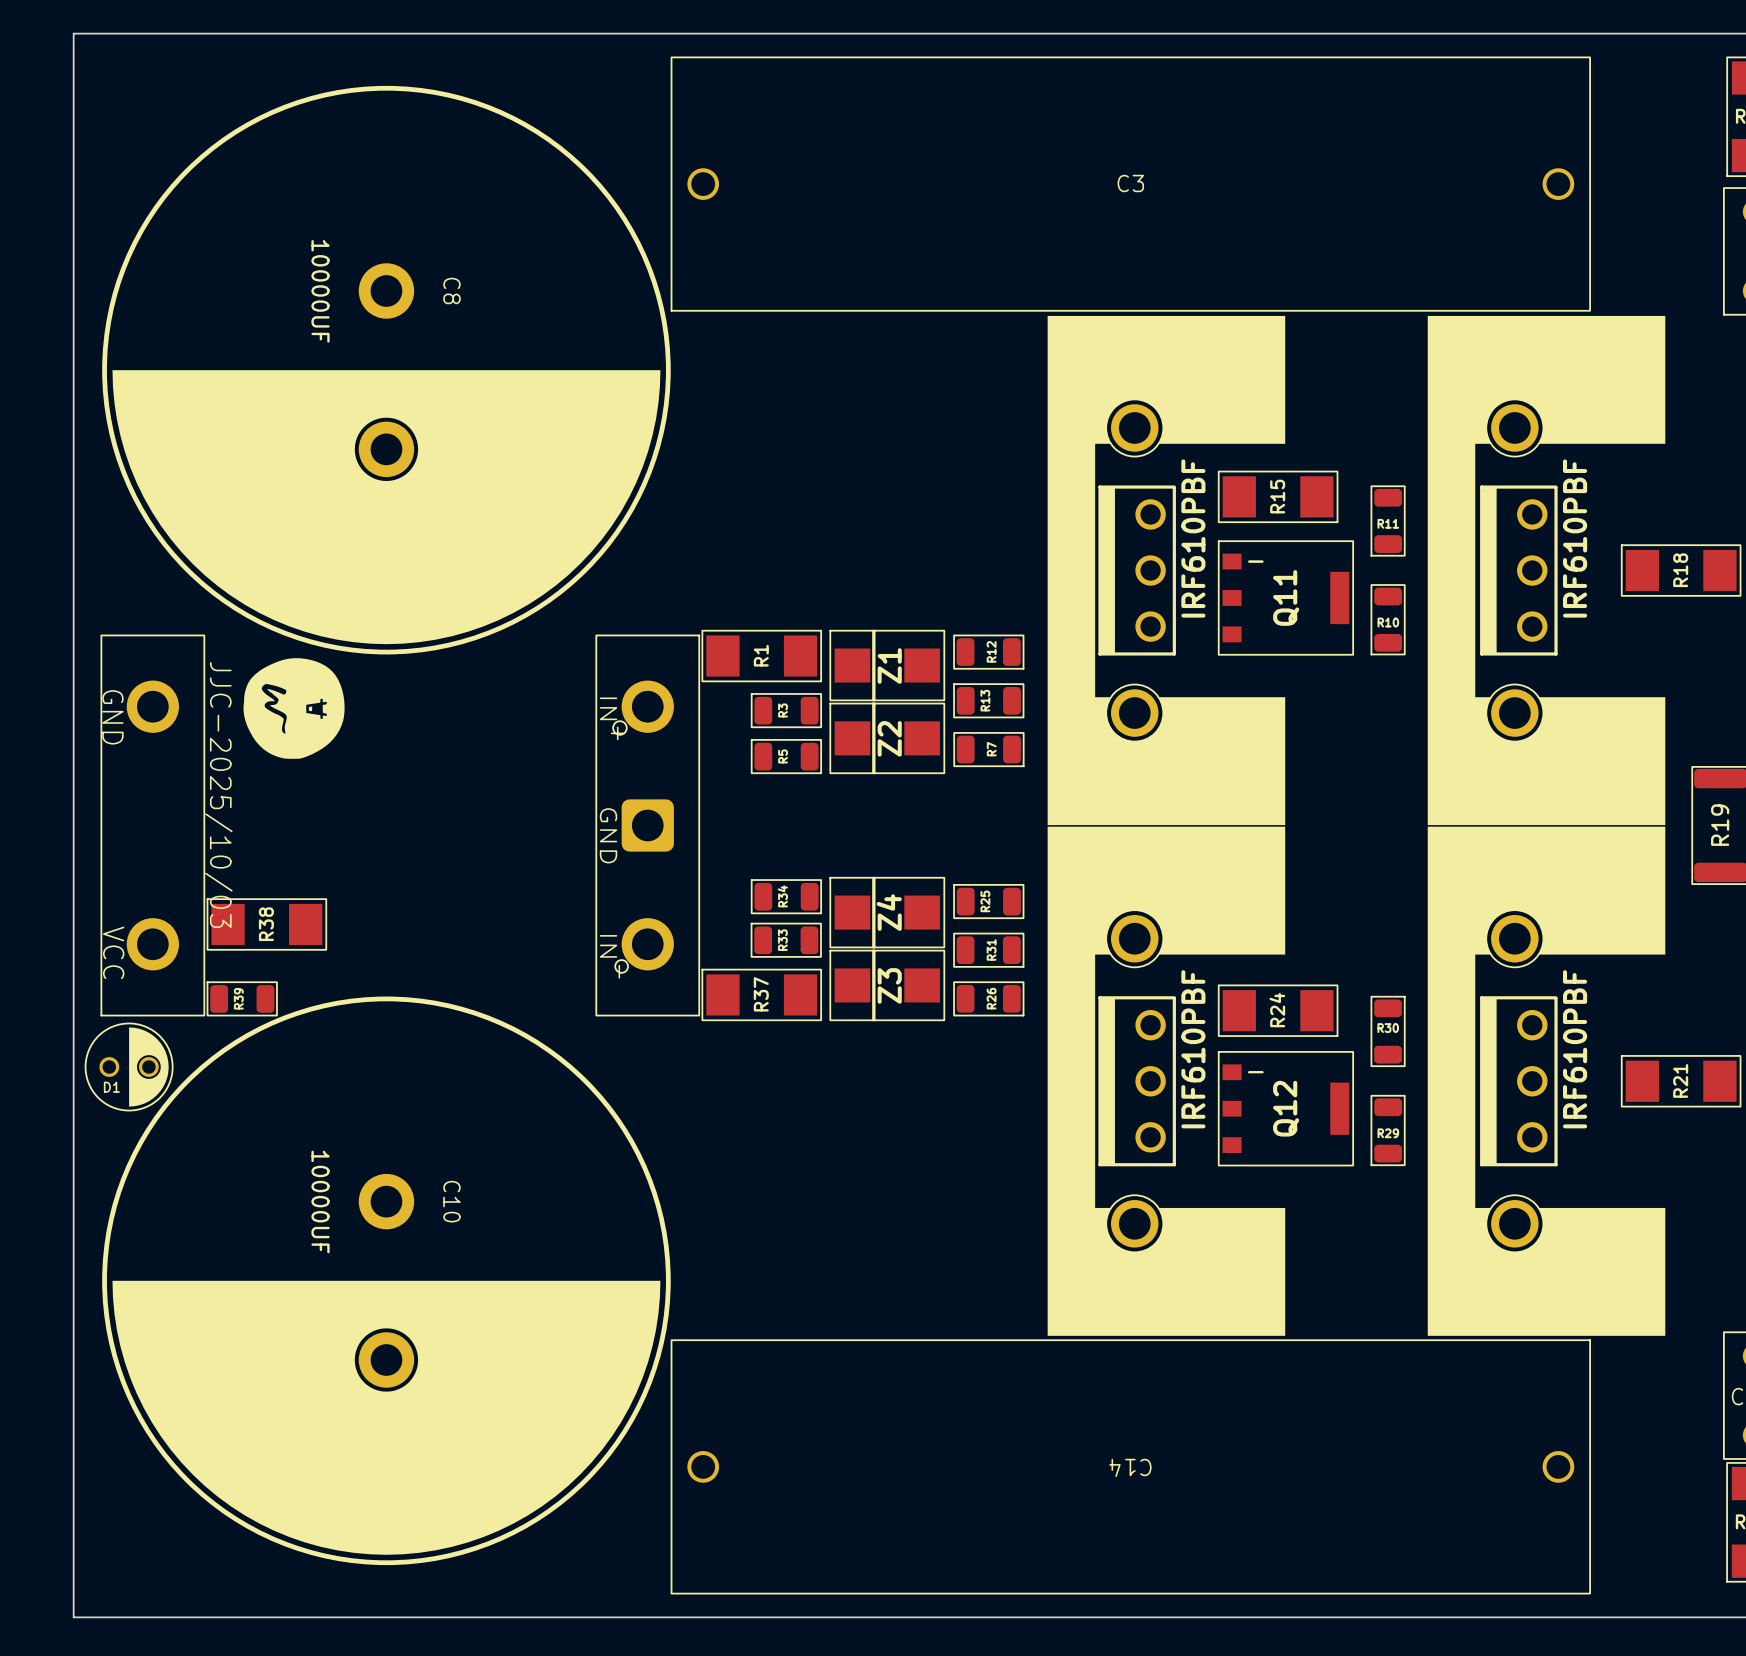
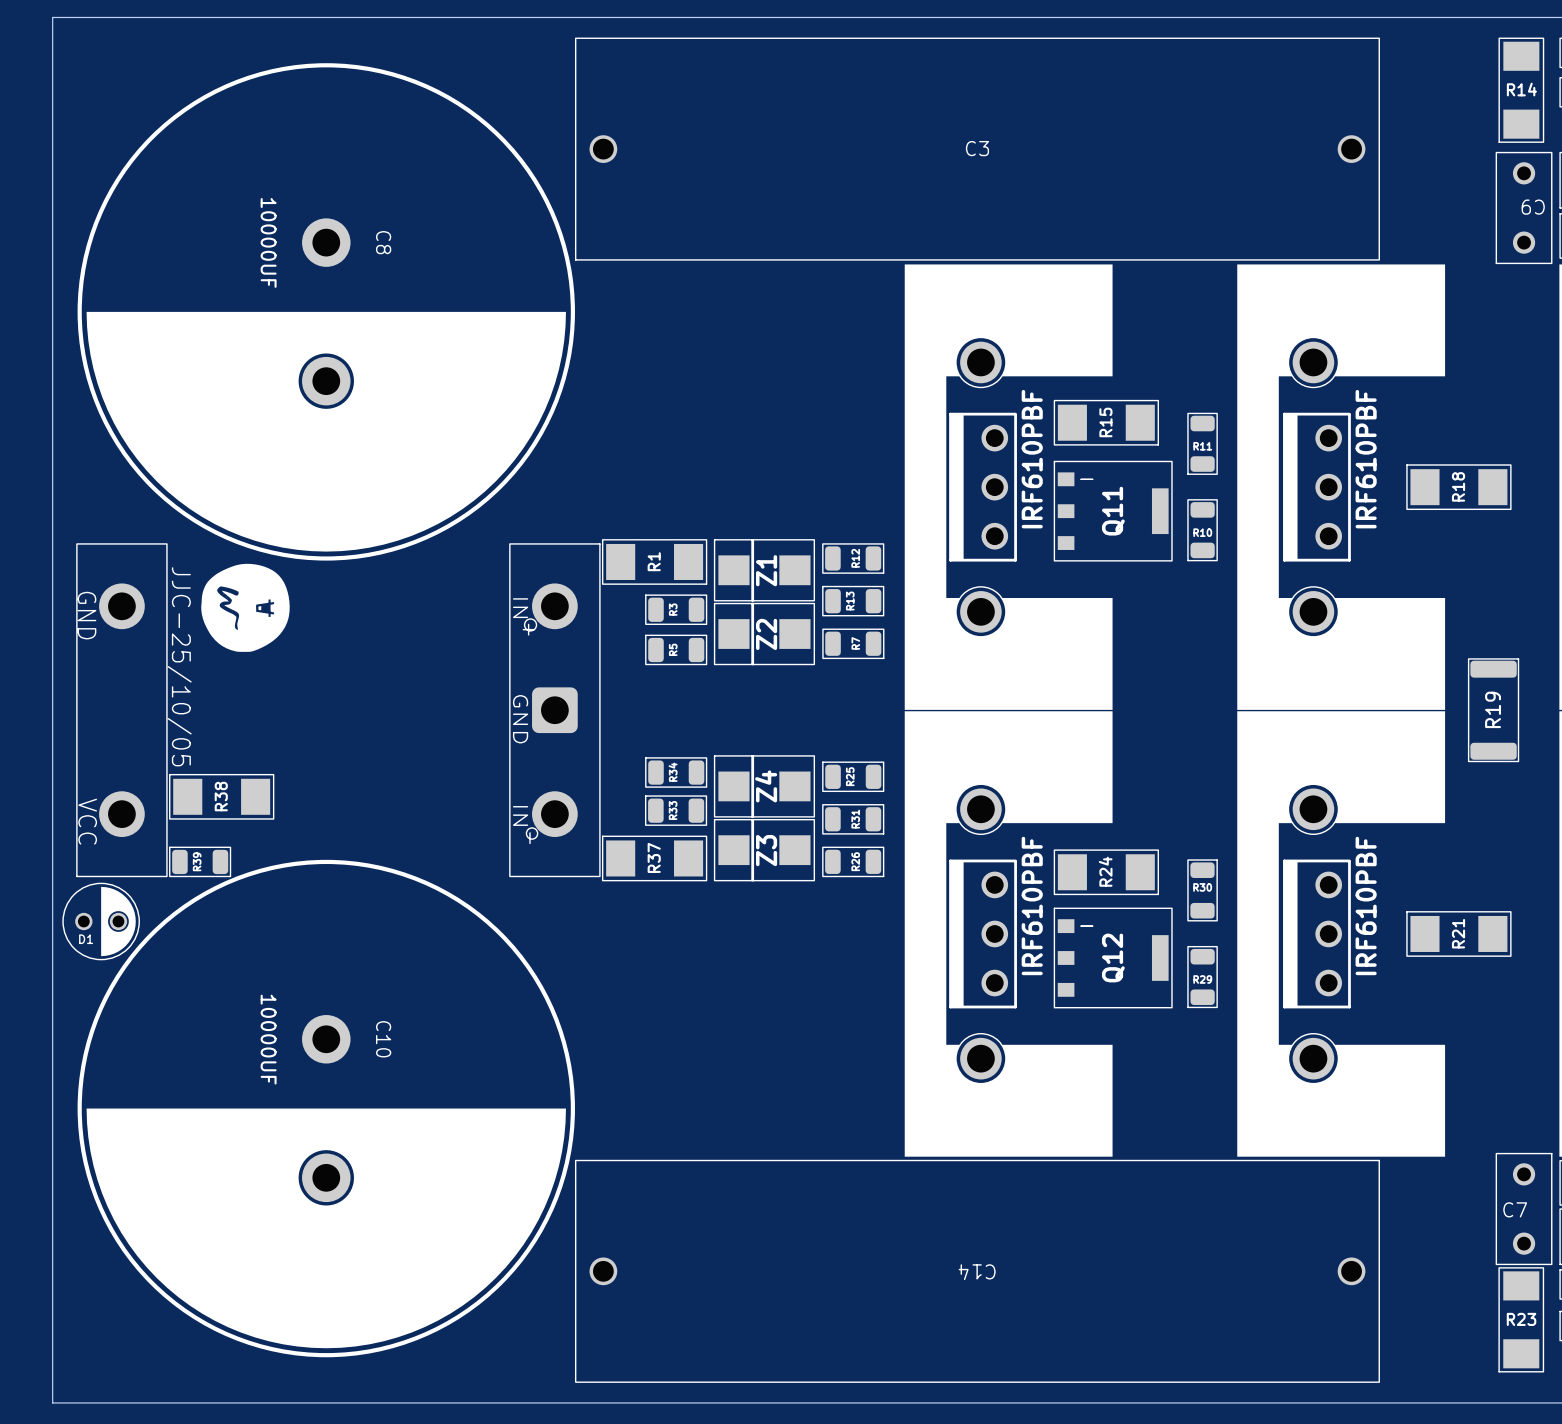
drawing shape: [205, 658, 345, 928] -> [167, 563, 290, 767]

